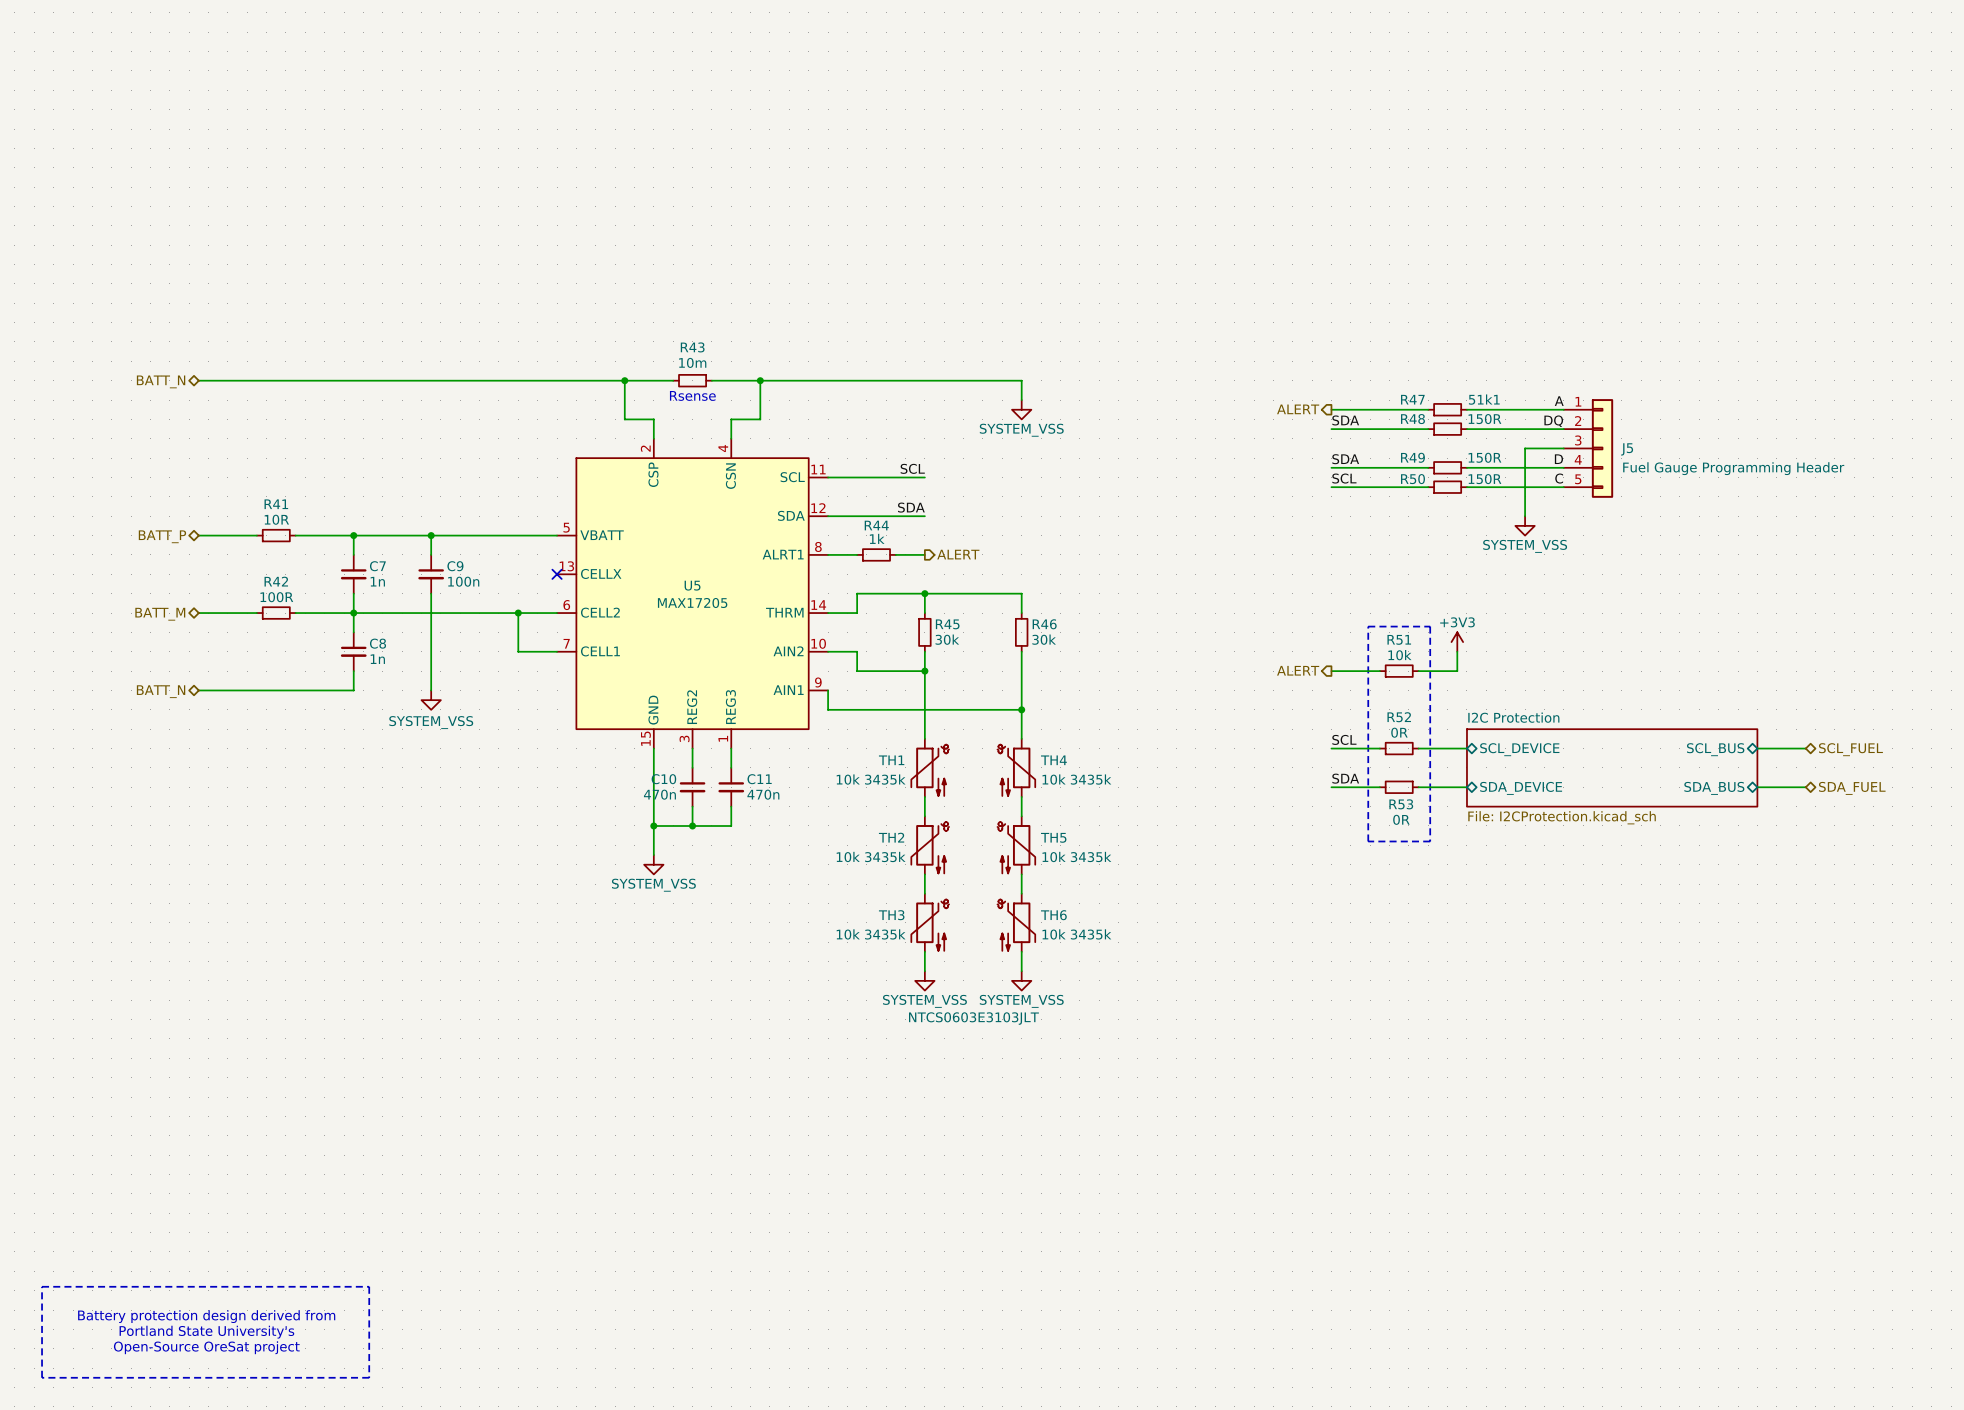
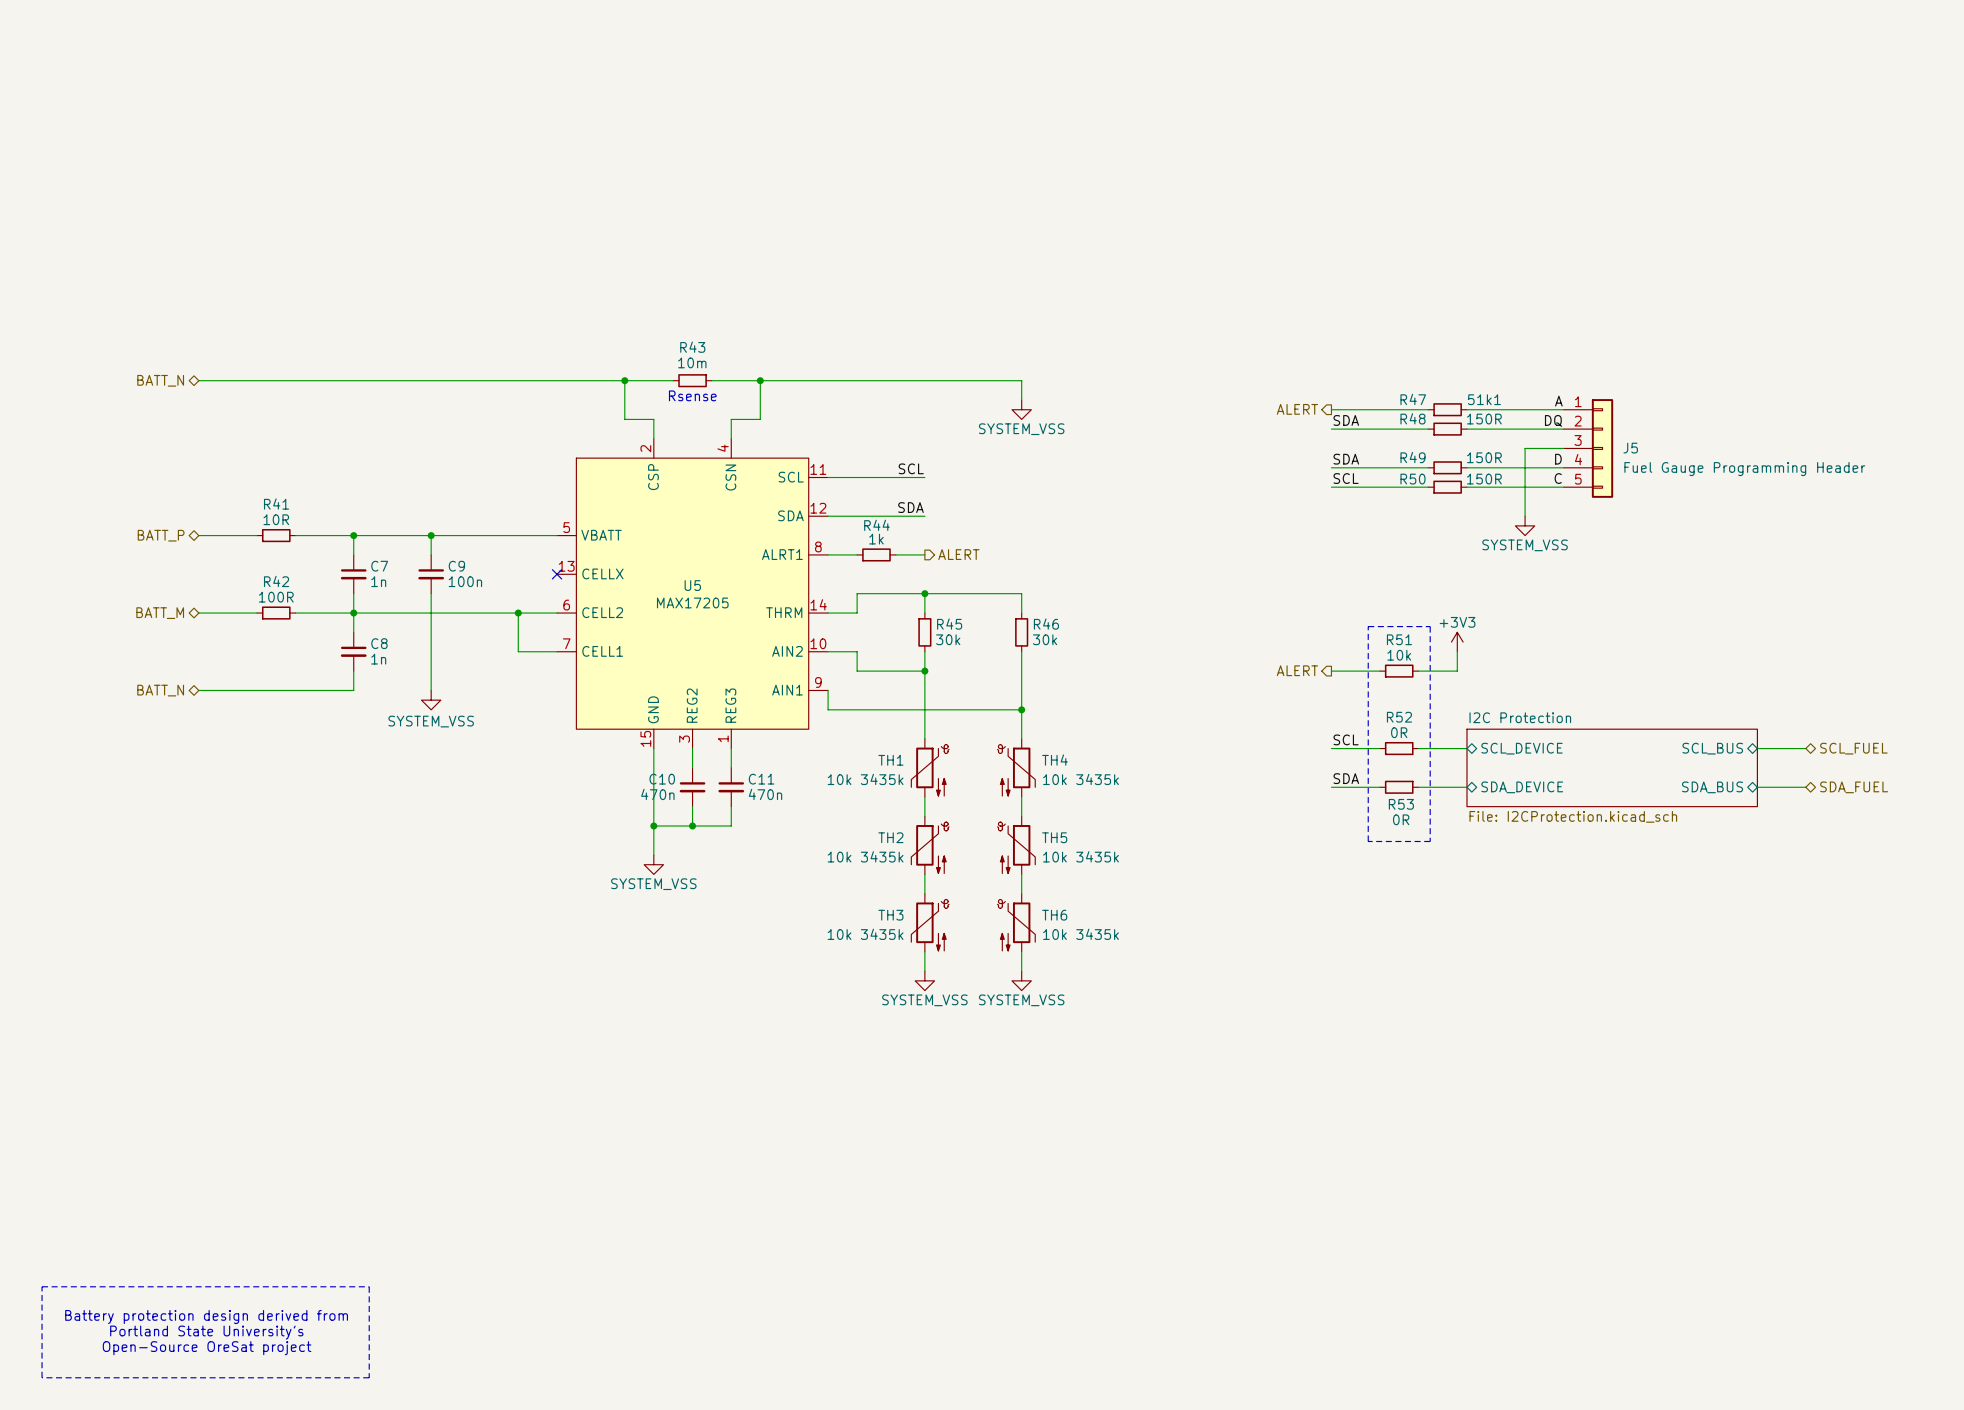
TH1 text: NTCS0603E3103JLT (973, 1018) -> none

